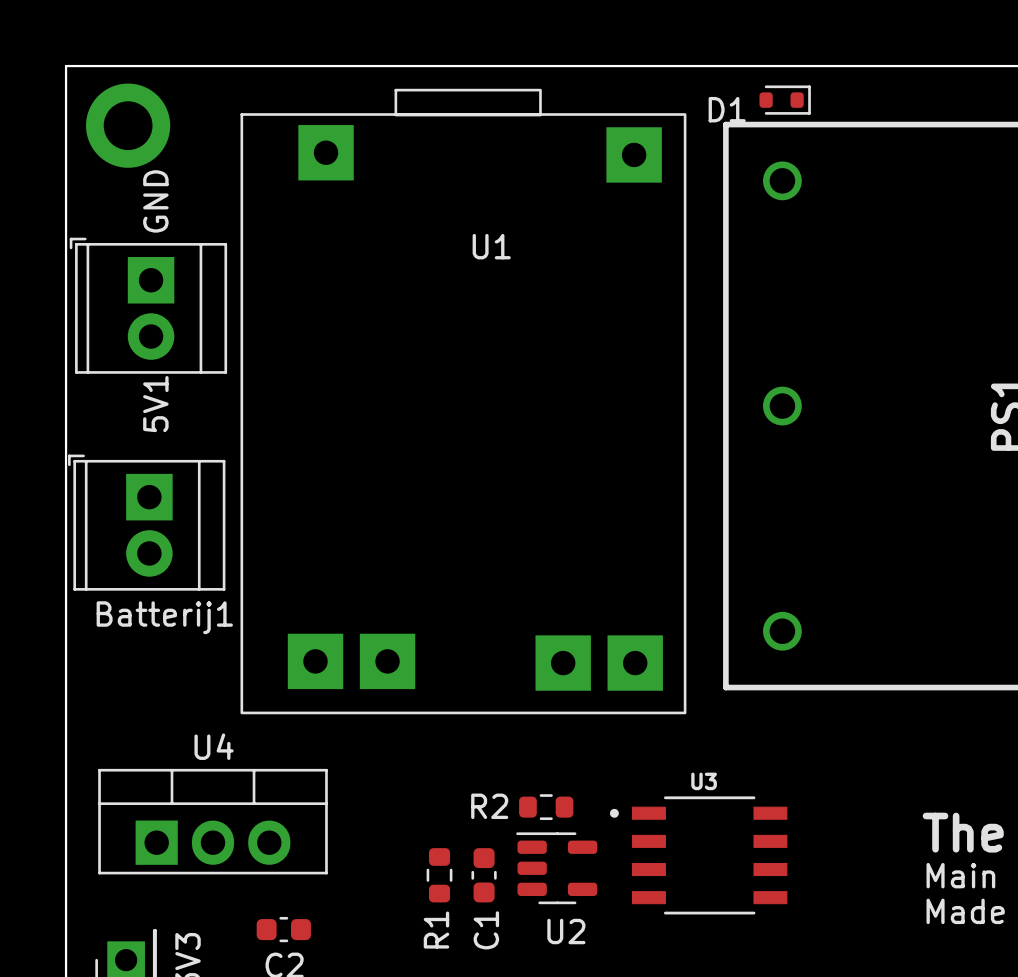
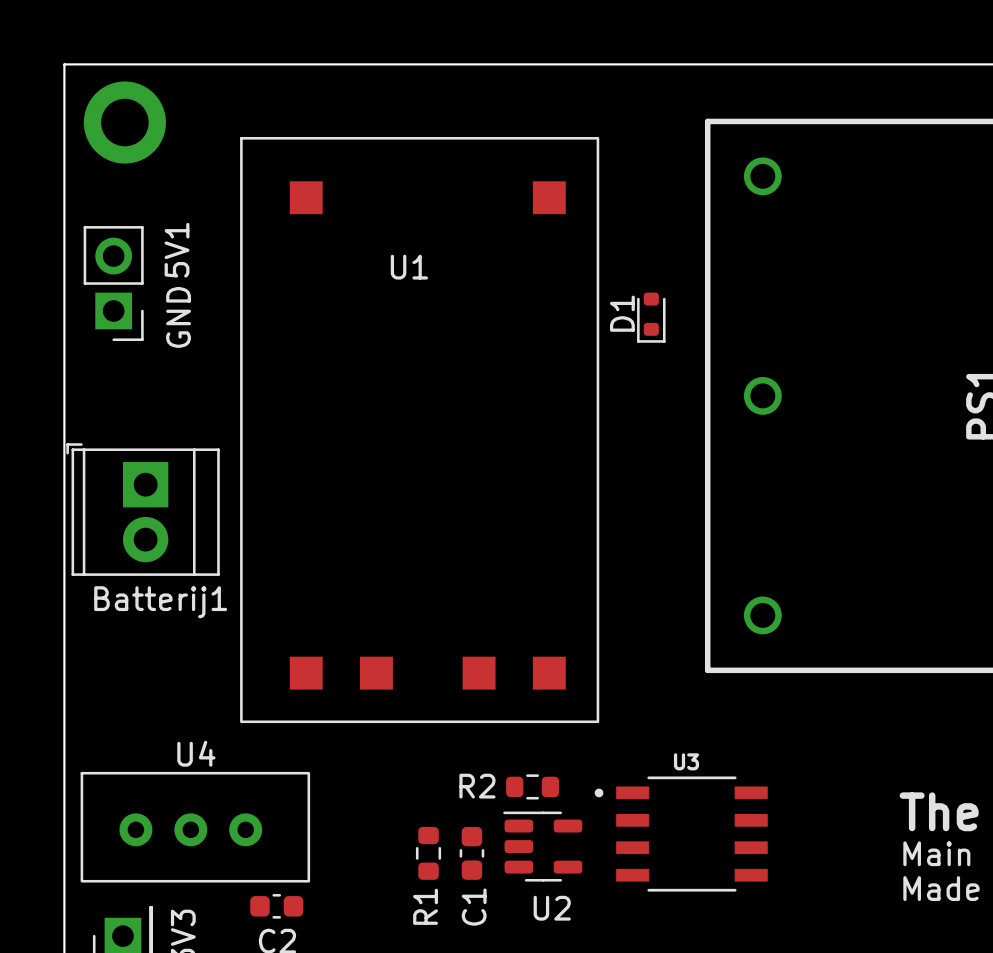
U1 footprint: [240, 88, 687, 715] -> [240, 137, 600, 724]
D1 rotation: 0° (785, 100) -> 90° clockwise (651, 317)
D1 position: (785, 100) -> (651, 317)
text position: GND (155, 201) -> GND (178, 317)
5V1 footprint: [69, 237, 228, 374] -> [83, 226, 144, 342]
5V1 name position: 5V1 (155, 404) -> 5V1 (177, 250)
U4 footprint: [98, 768, 328, 875] -> [80, 771, 311, 883]

